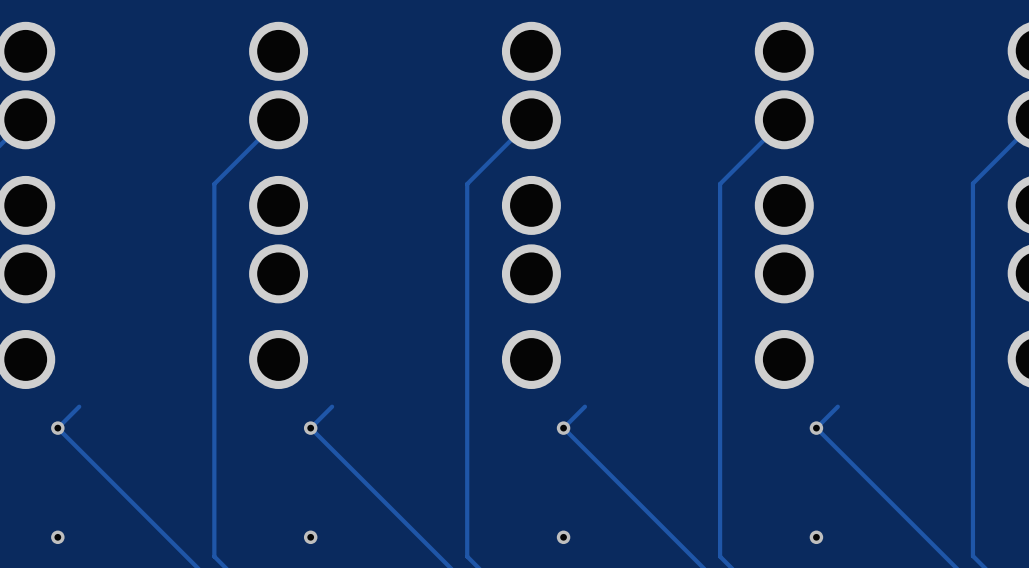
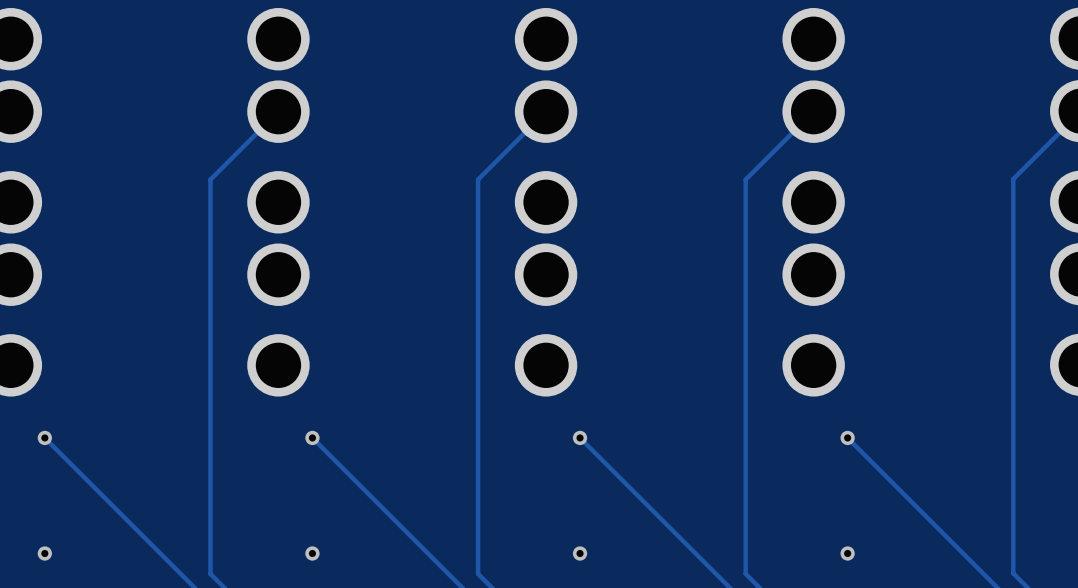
track: (79, 406) (57, 428) -> none
track: (332, 406) (310, 428) -> none
track: (584, 406) (563, 428) -> none
track: (837, 406) (816, 428) -> none

